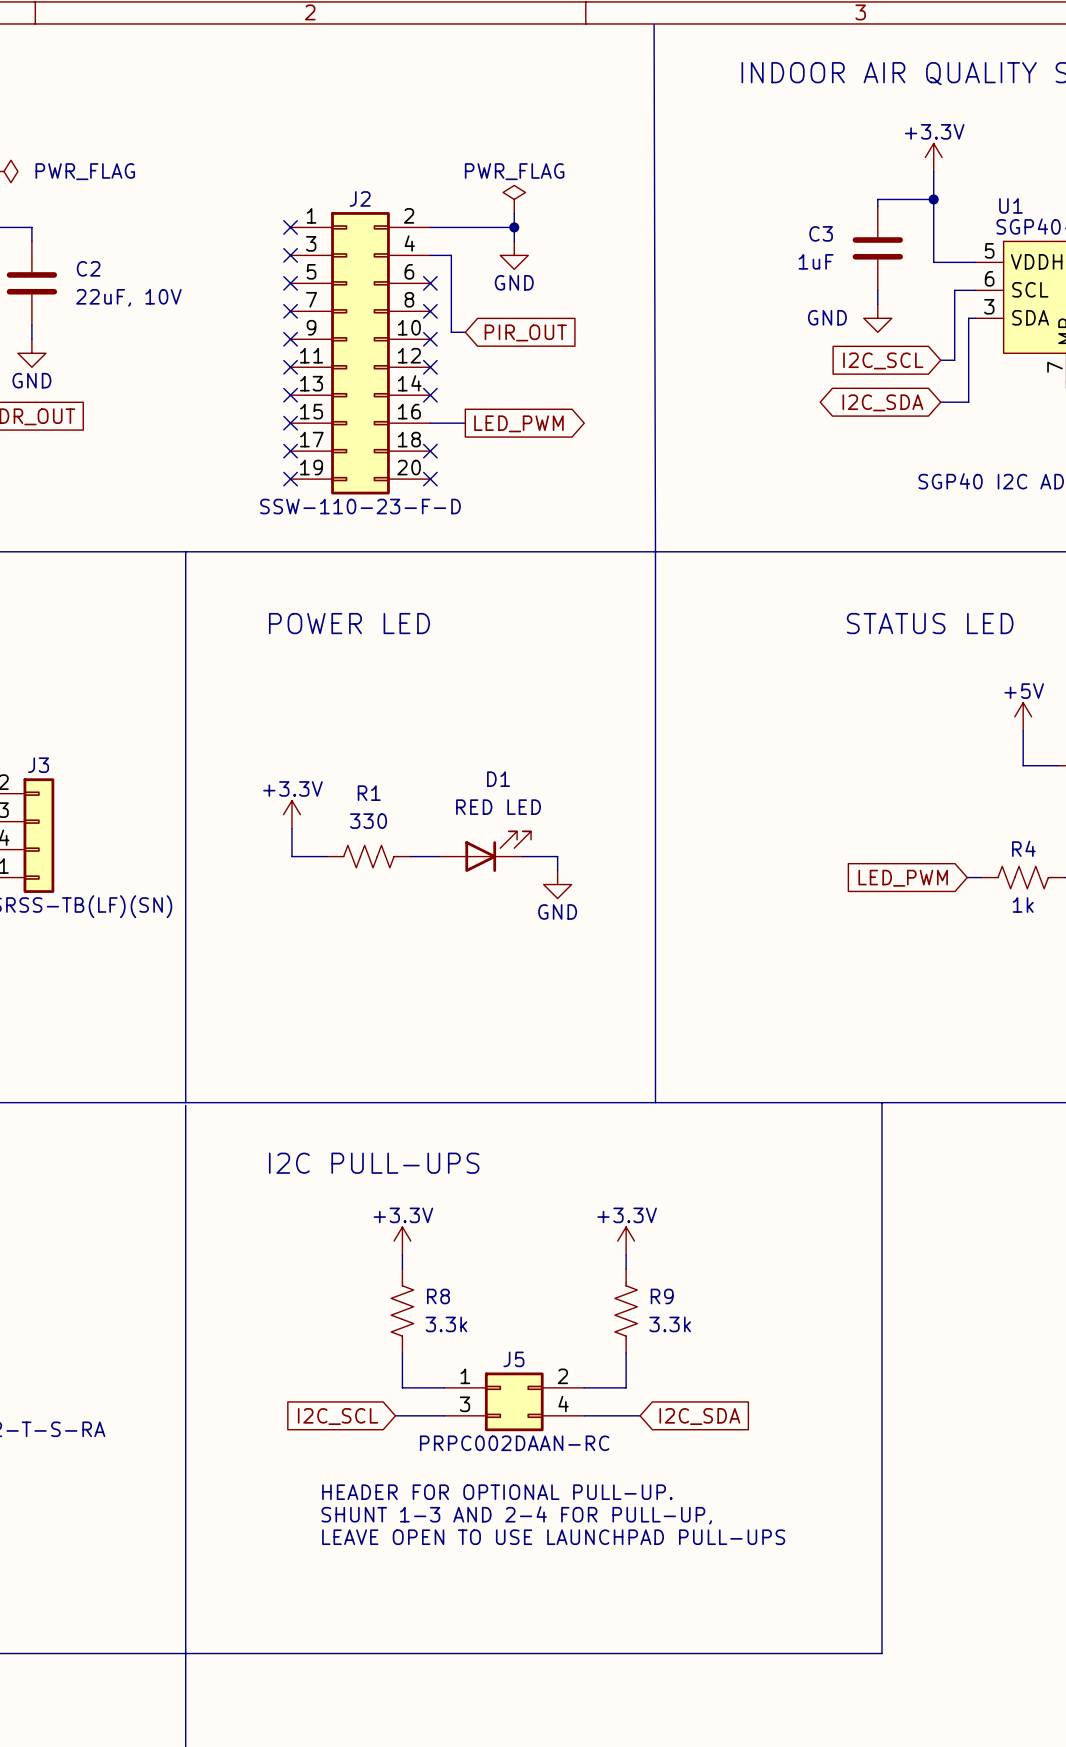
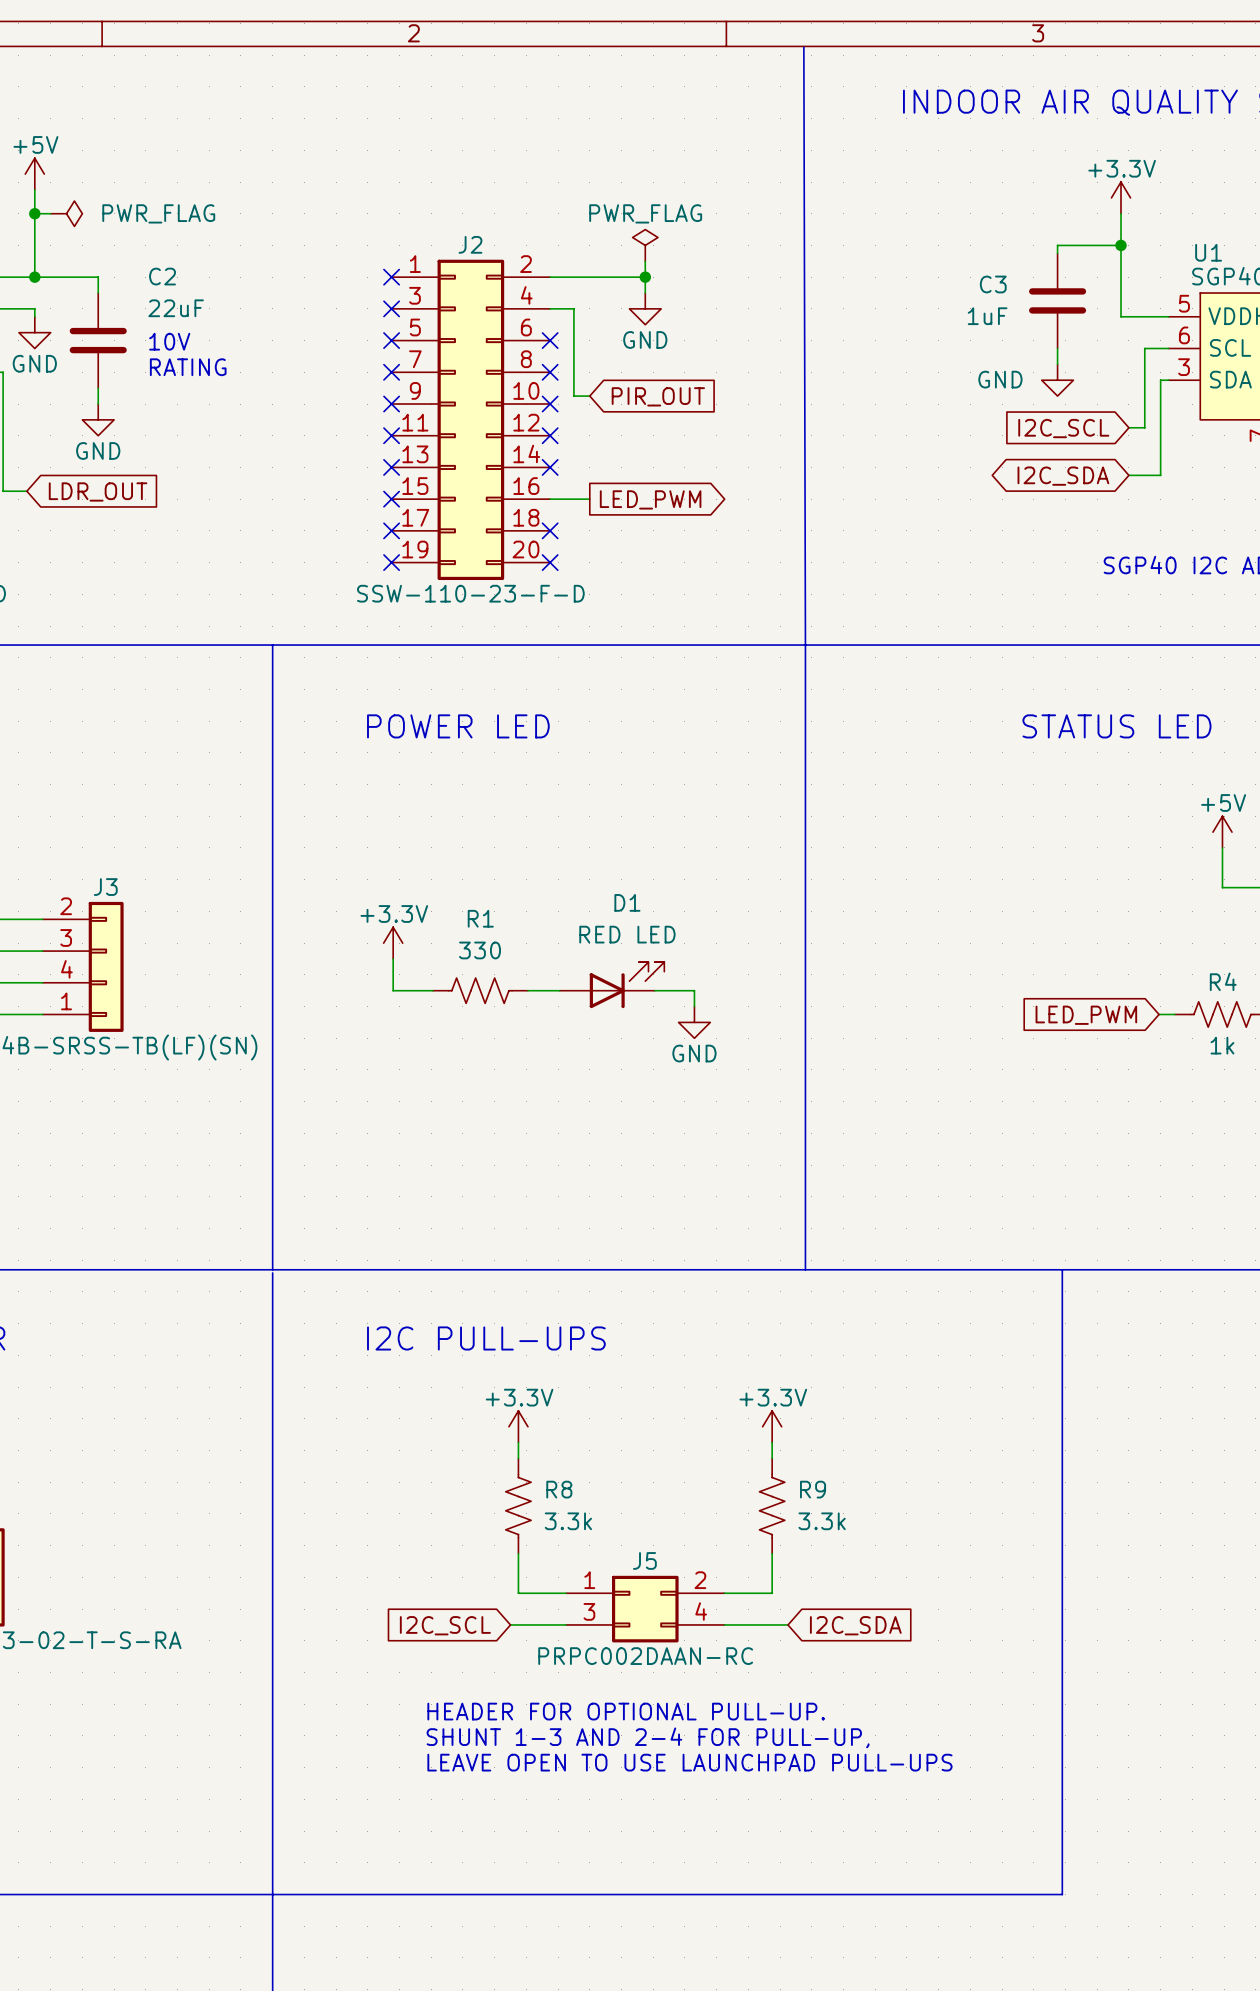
C2 name position: C2 (88, 268) -> C2 (162, 276)
text: none -> 10V (169, 341)
C2 value: 22uF, 10V (128, 297) -> 22uF (176, 308)
text: none -> RATING (188, 367)

